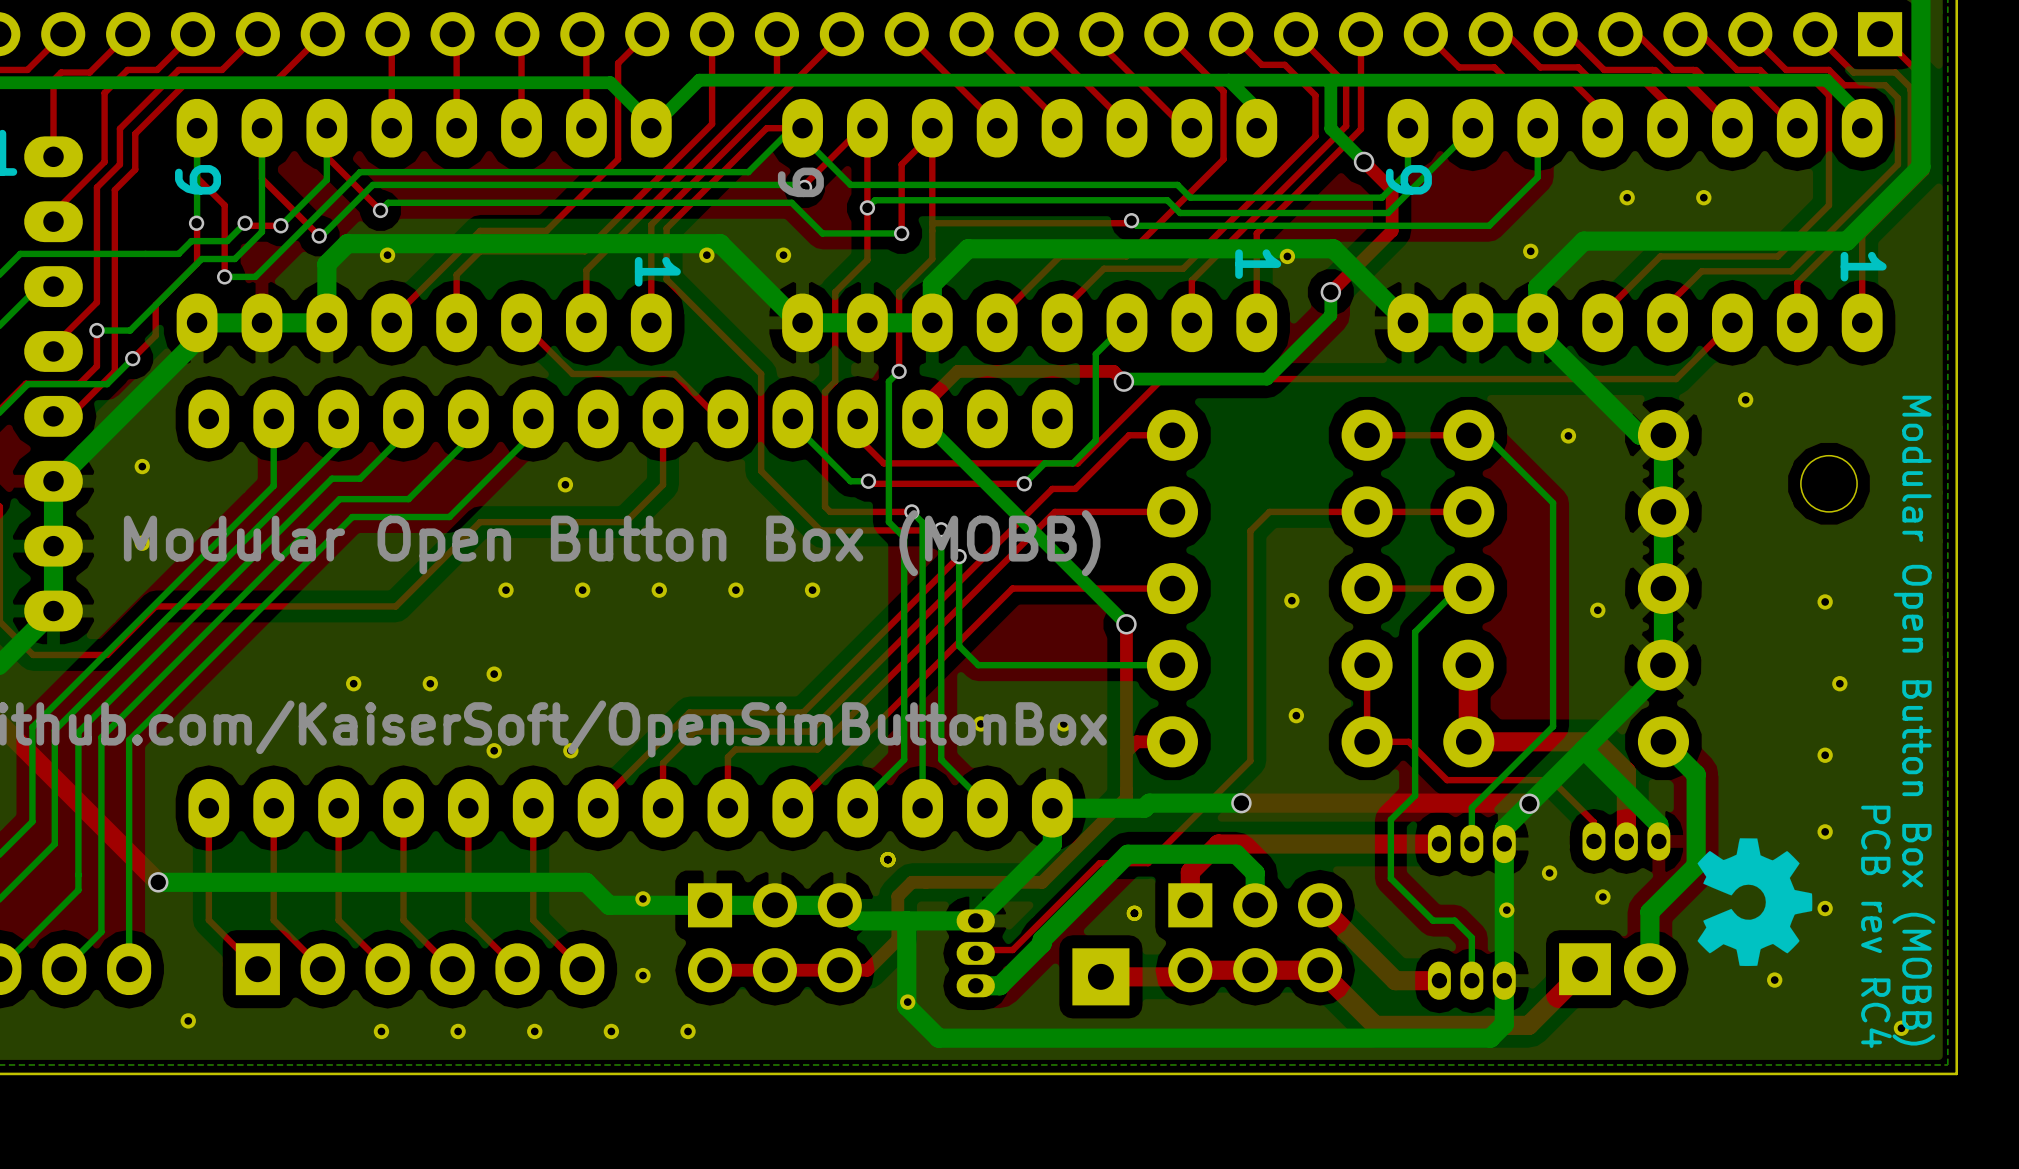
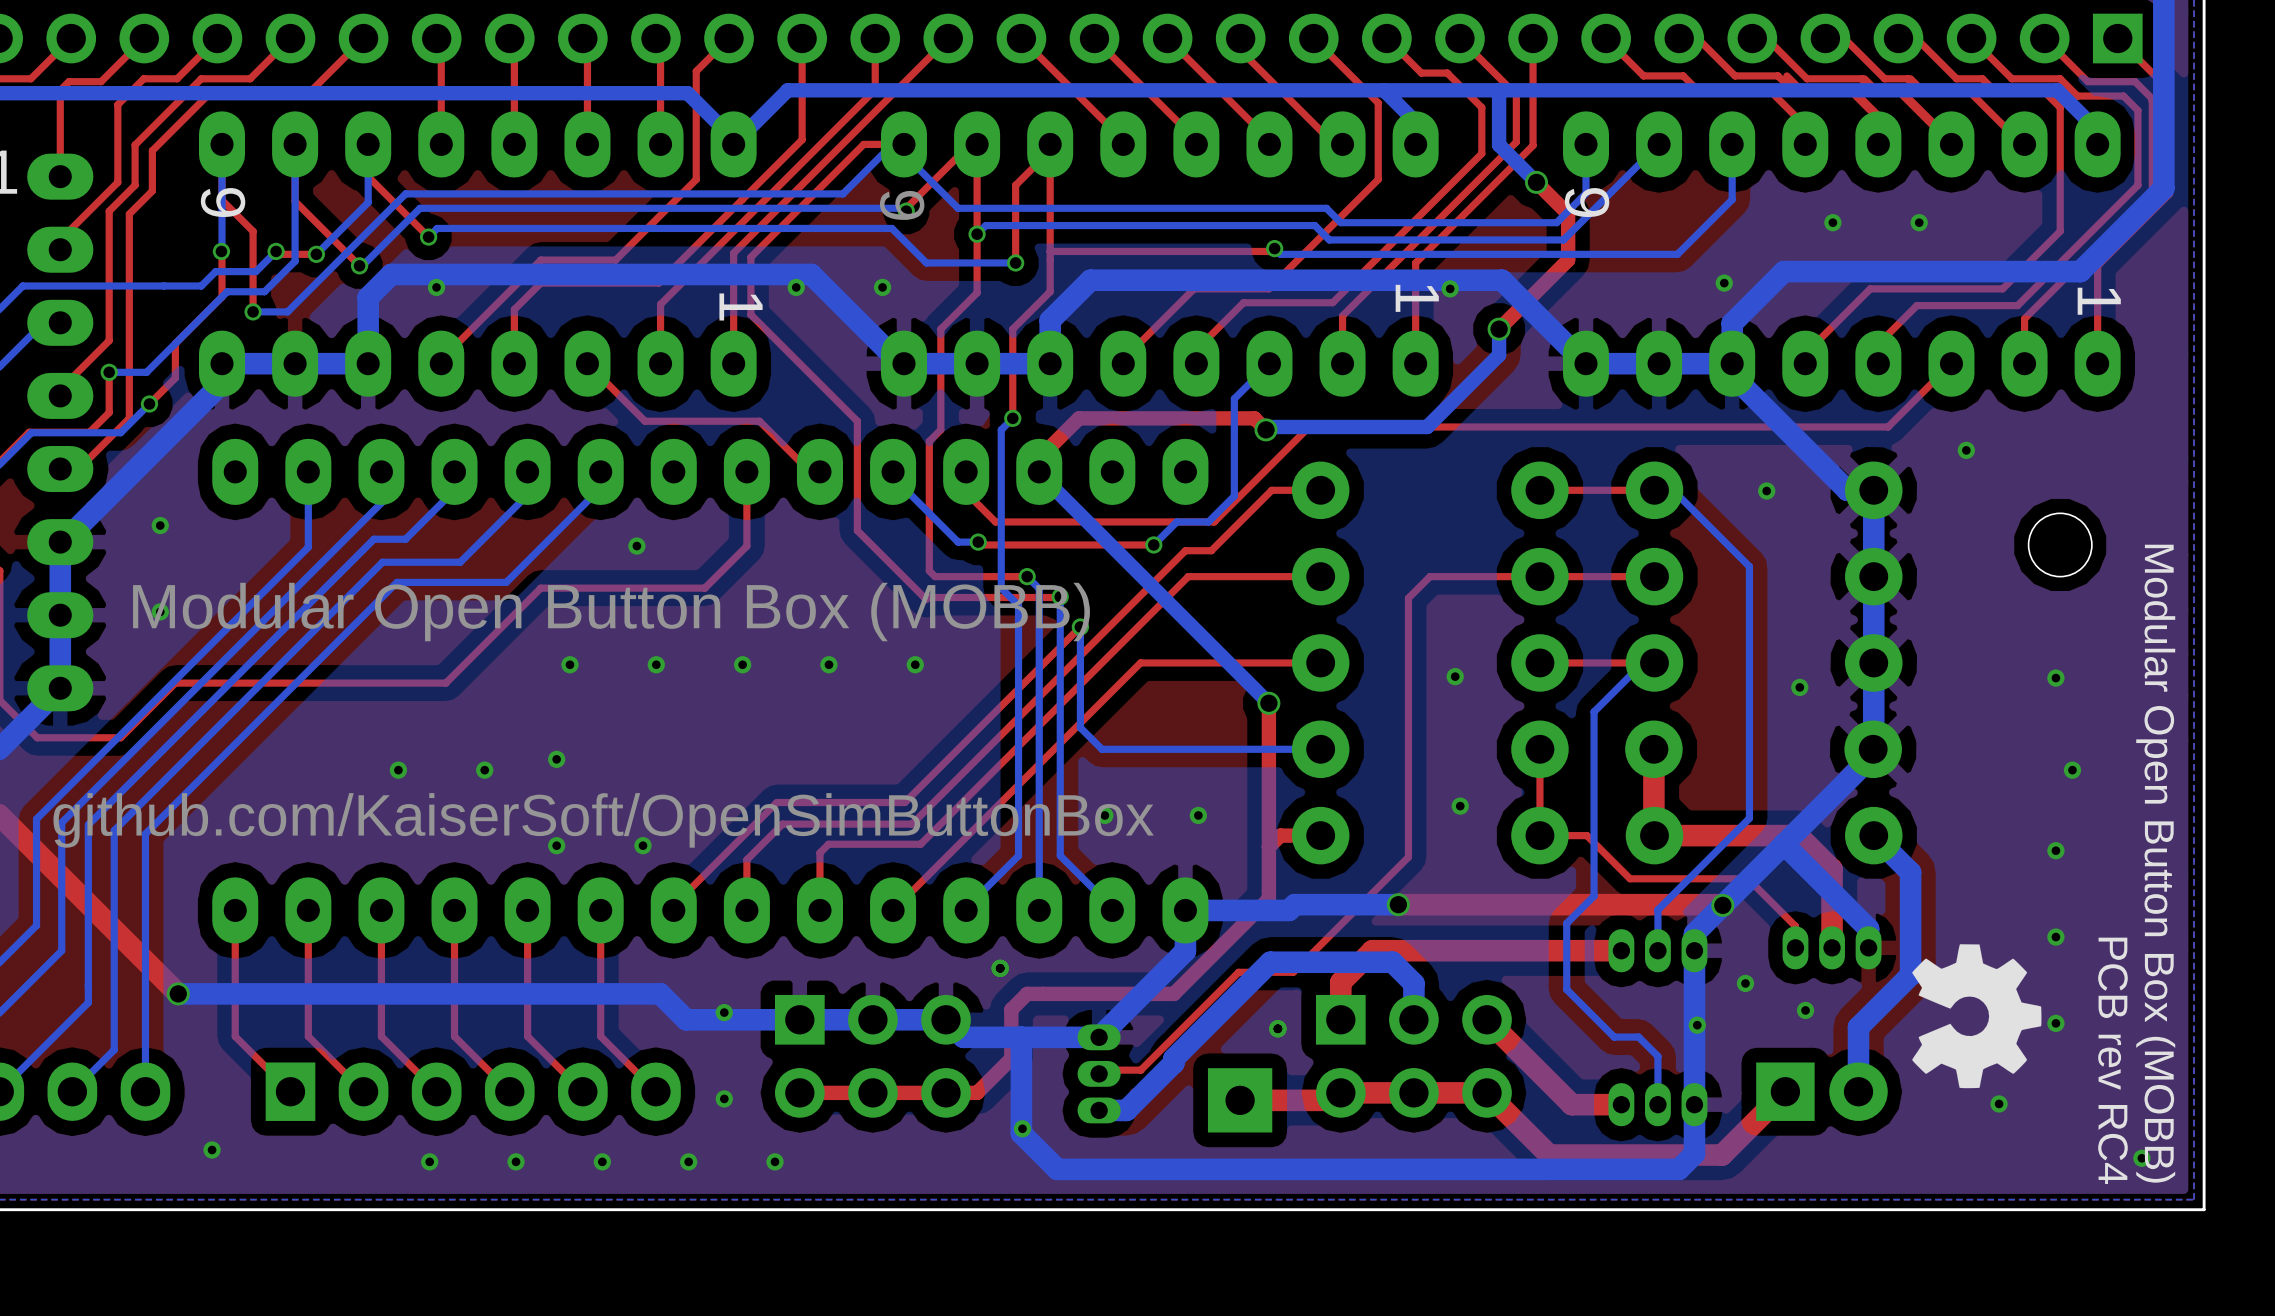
top track: none -> (1786, 75) (1804, 93)

